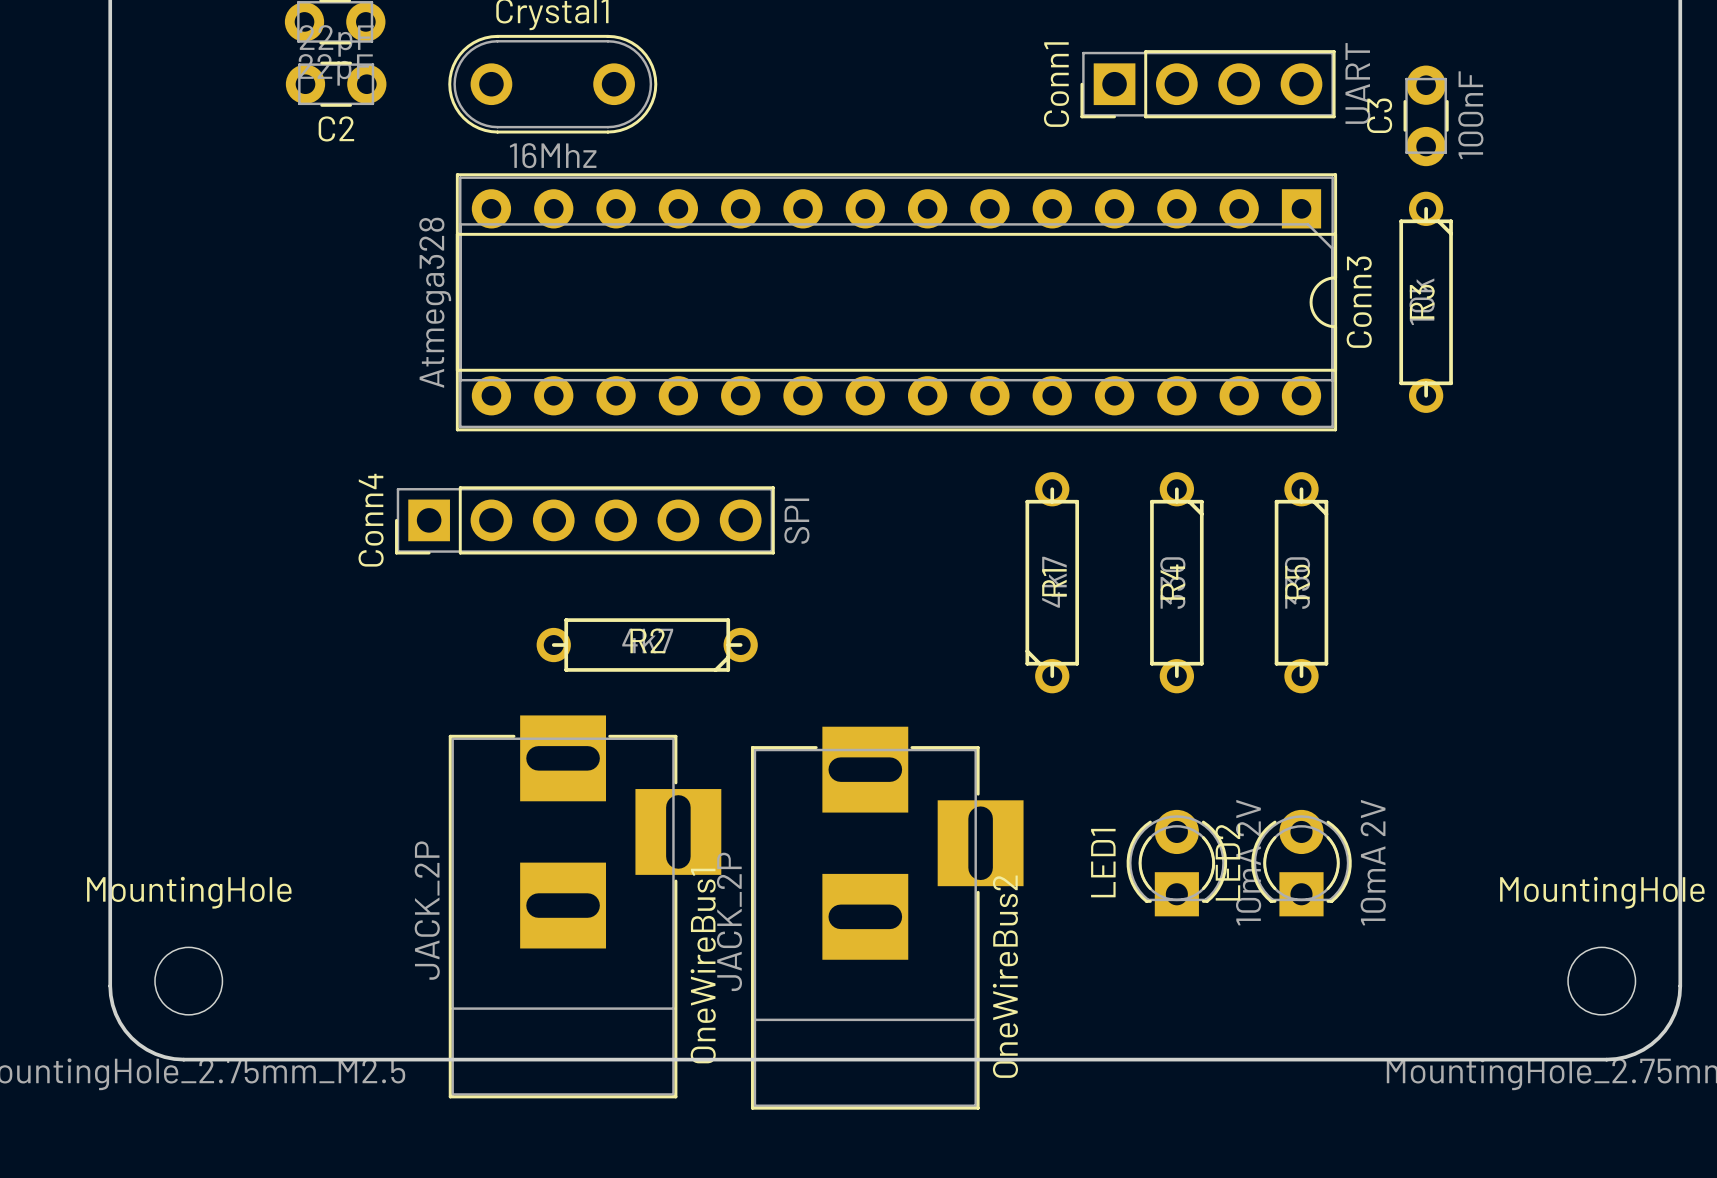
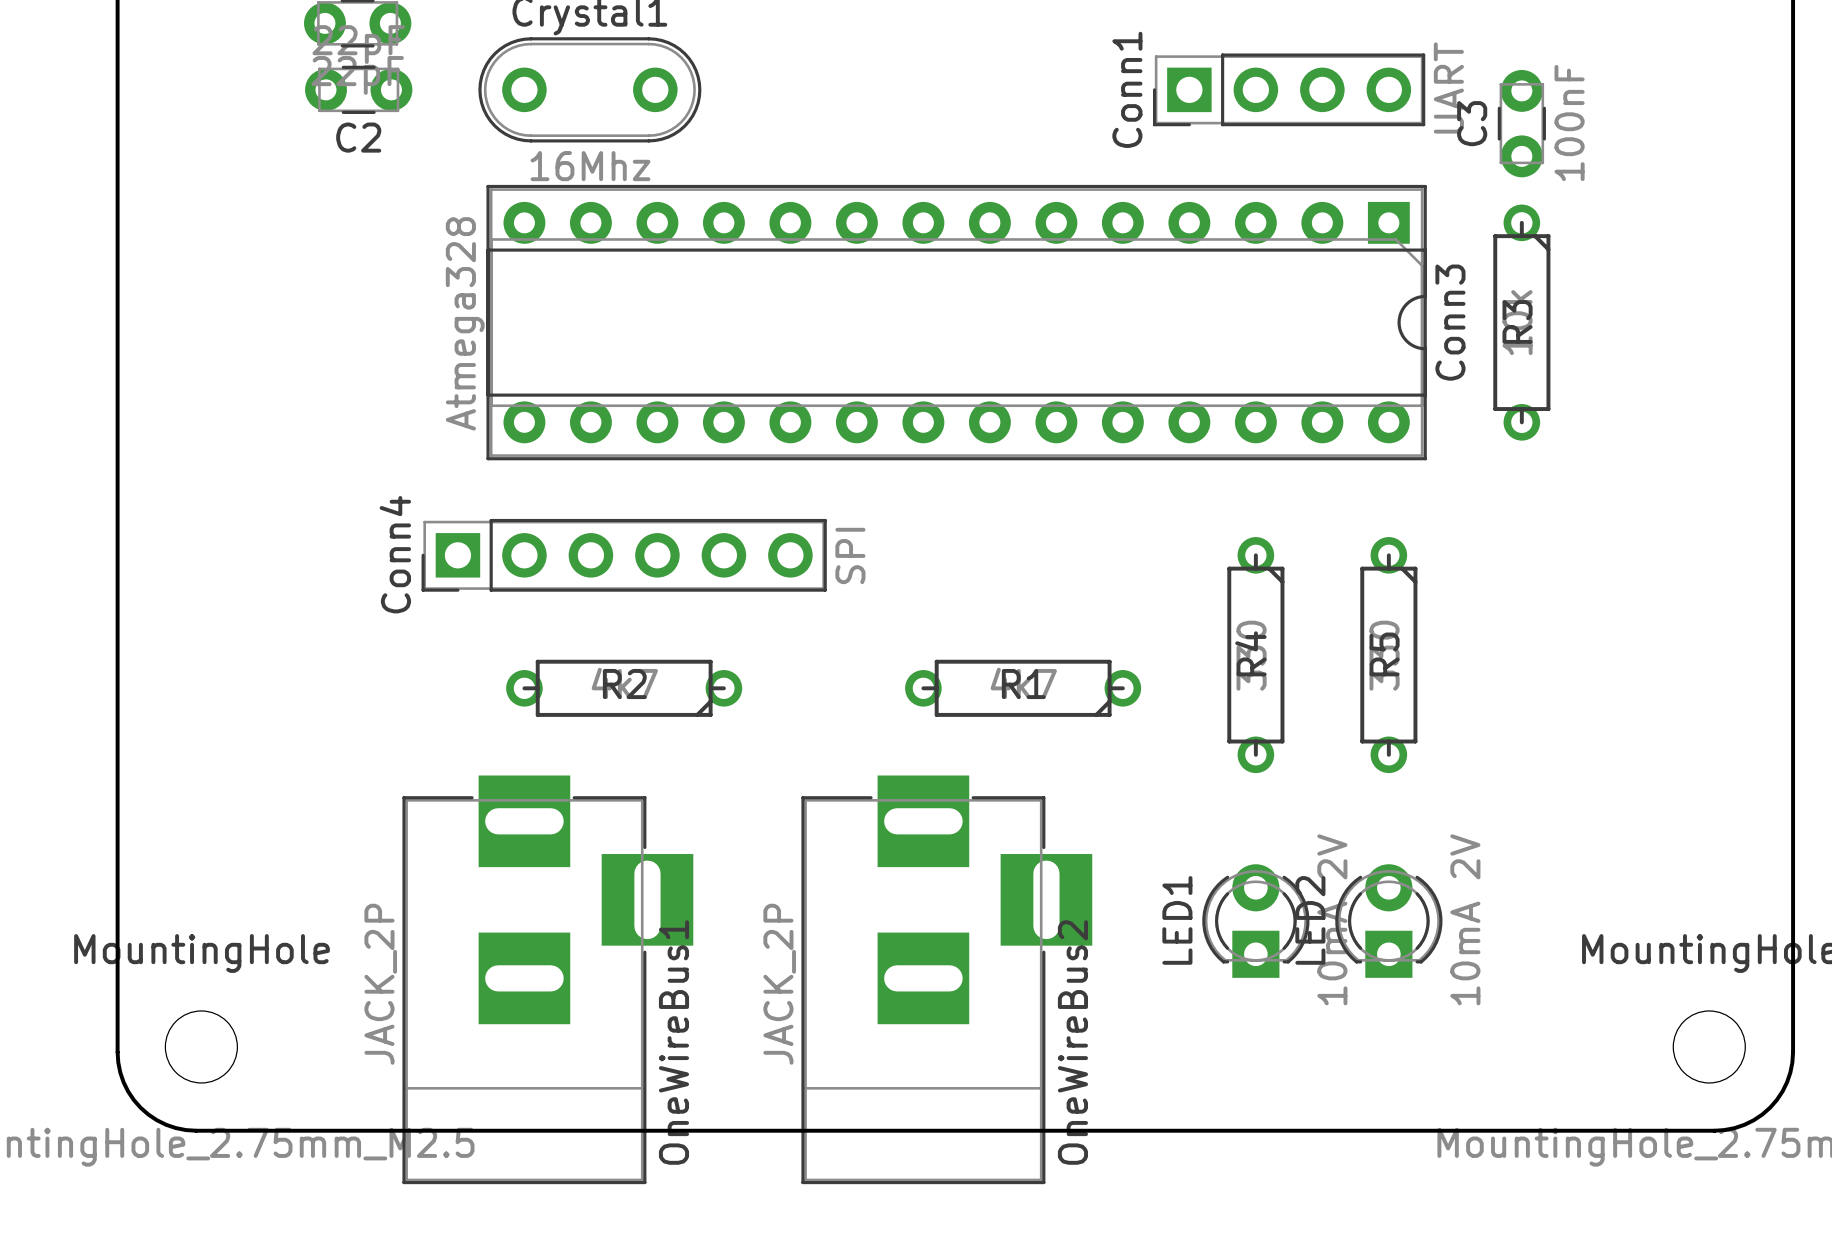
R1 rotation: 0° (1052, 582) -> 90° counterclockwise (1023, 688)
R4 position: (1176, 582) -> (1255, 655)
R5 position: (1301, 582) -> (1388, 655)
R2 position: (647, 645) -> (624, 688)
OneWireBus1 position: (585, 906) -> (547, 979)

